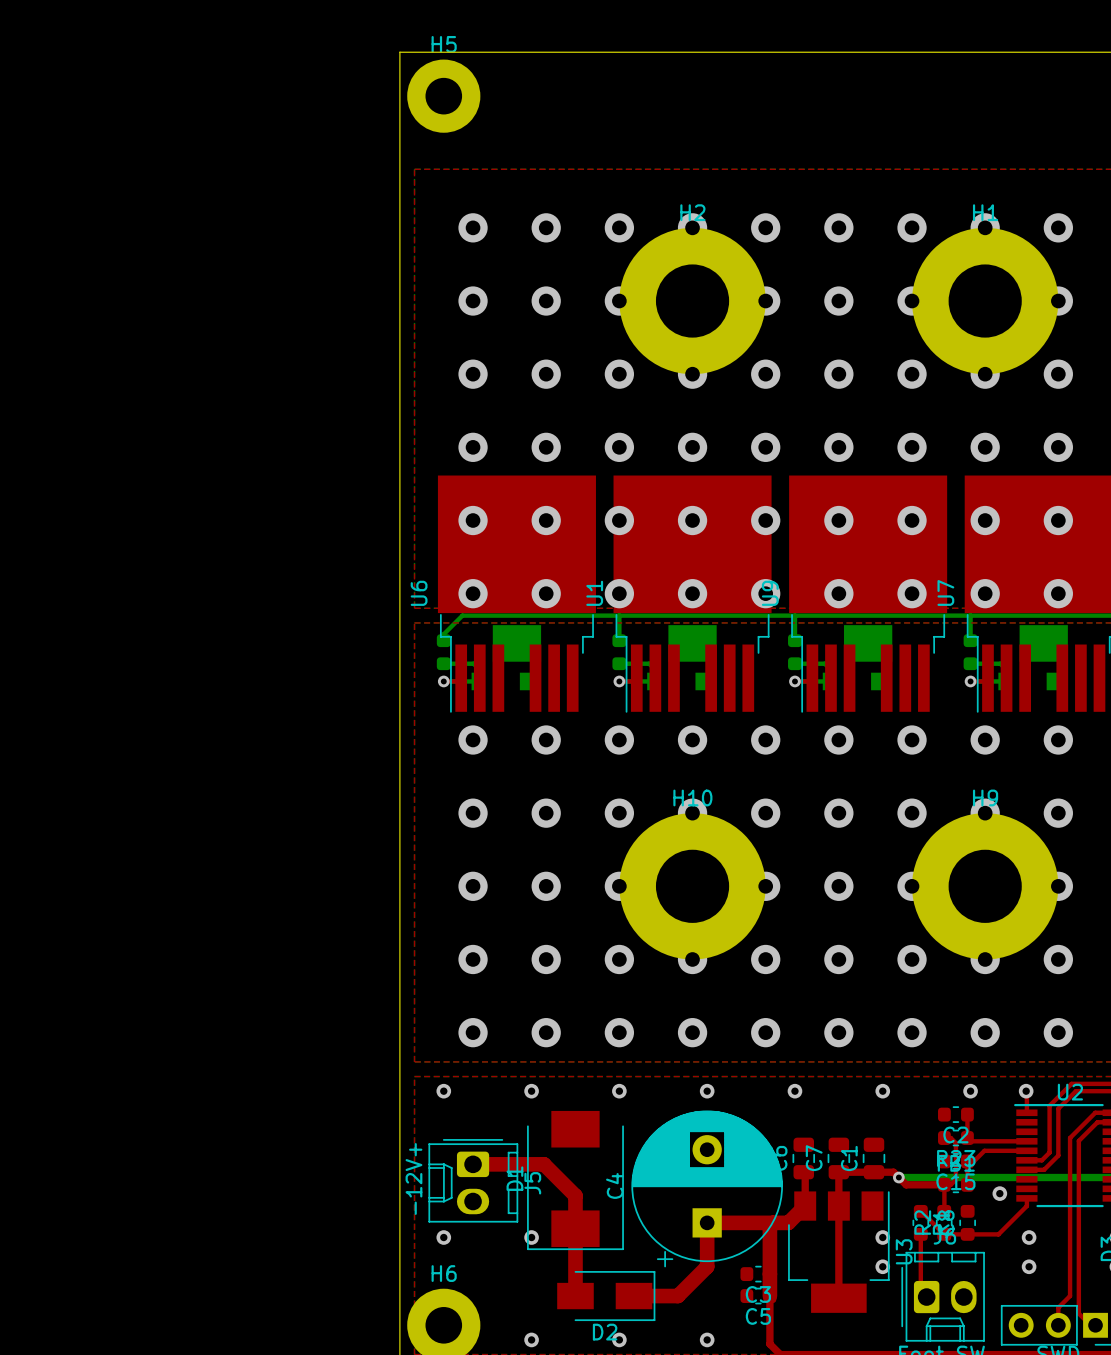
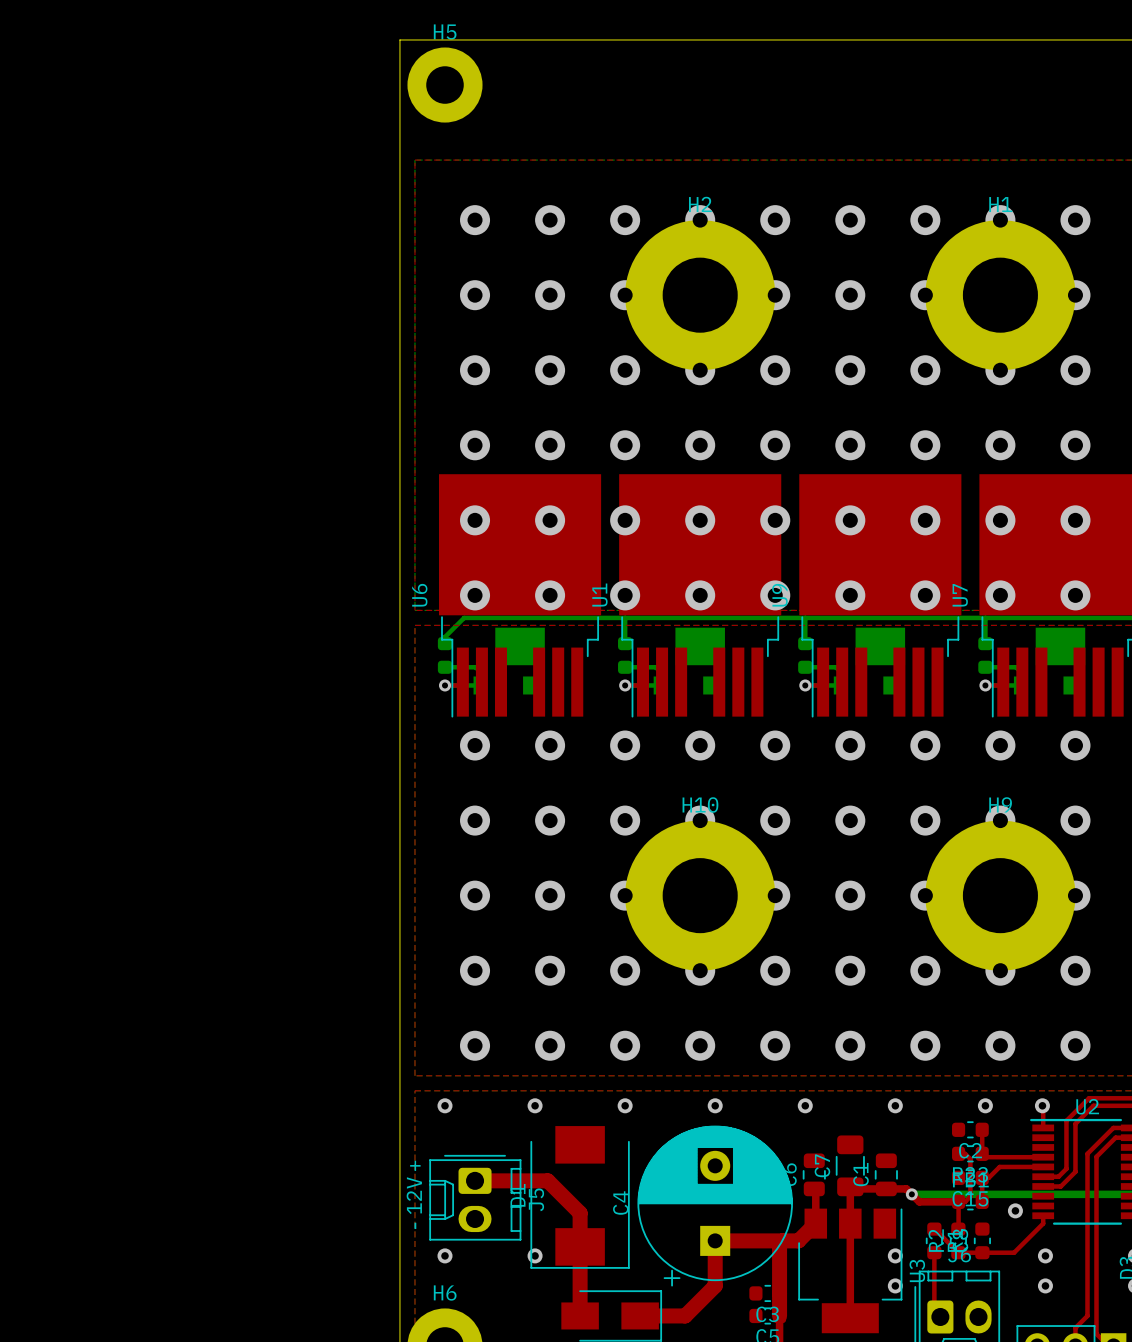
C7 footprint: [827, 1137, 851, 1180] -> [835, 1135, 865, 1197]

